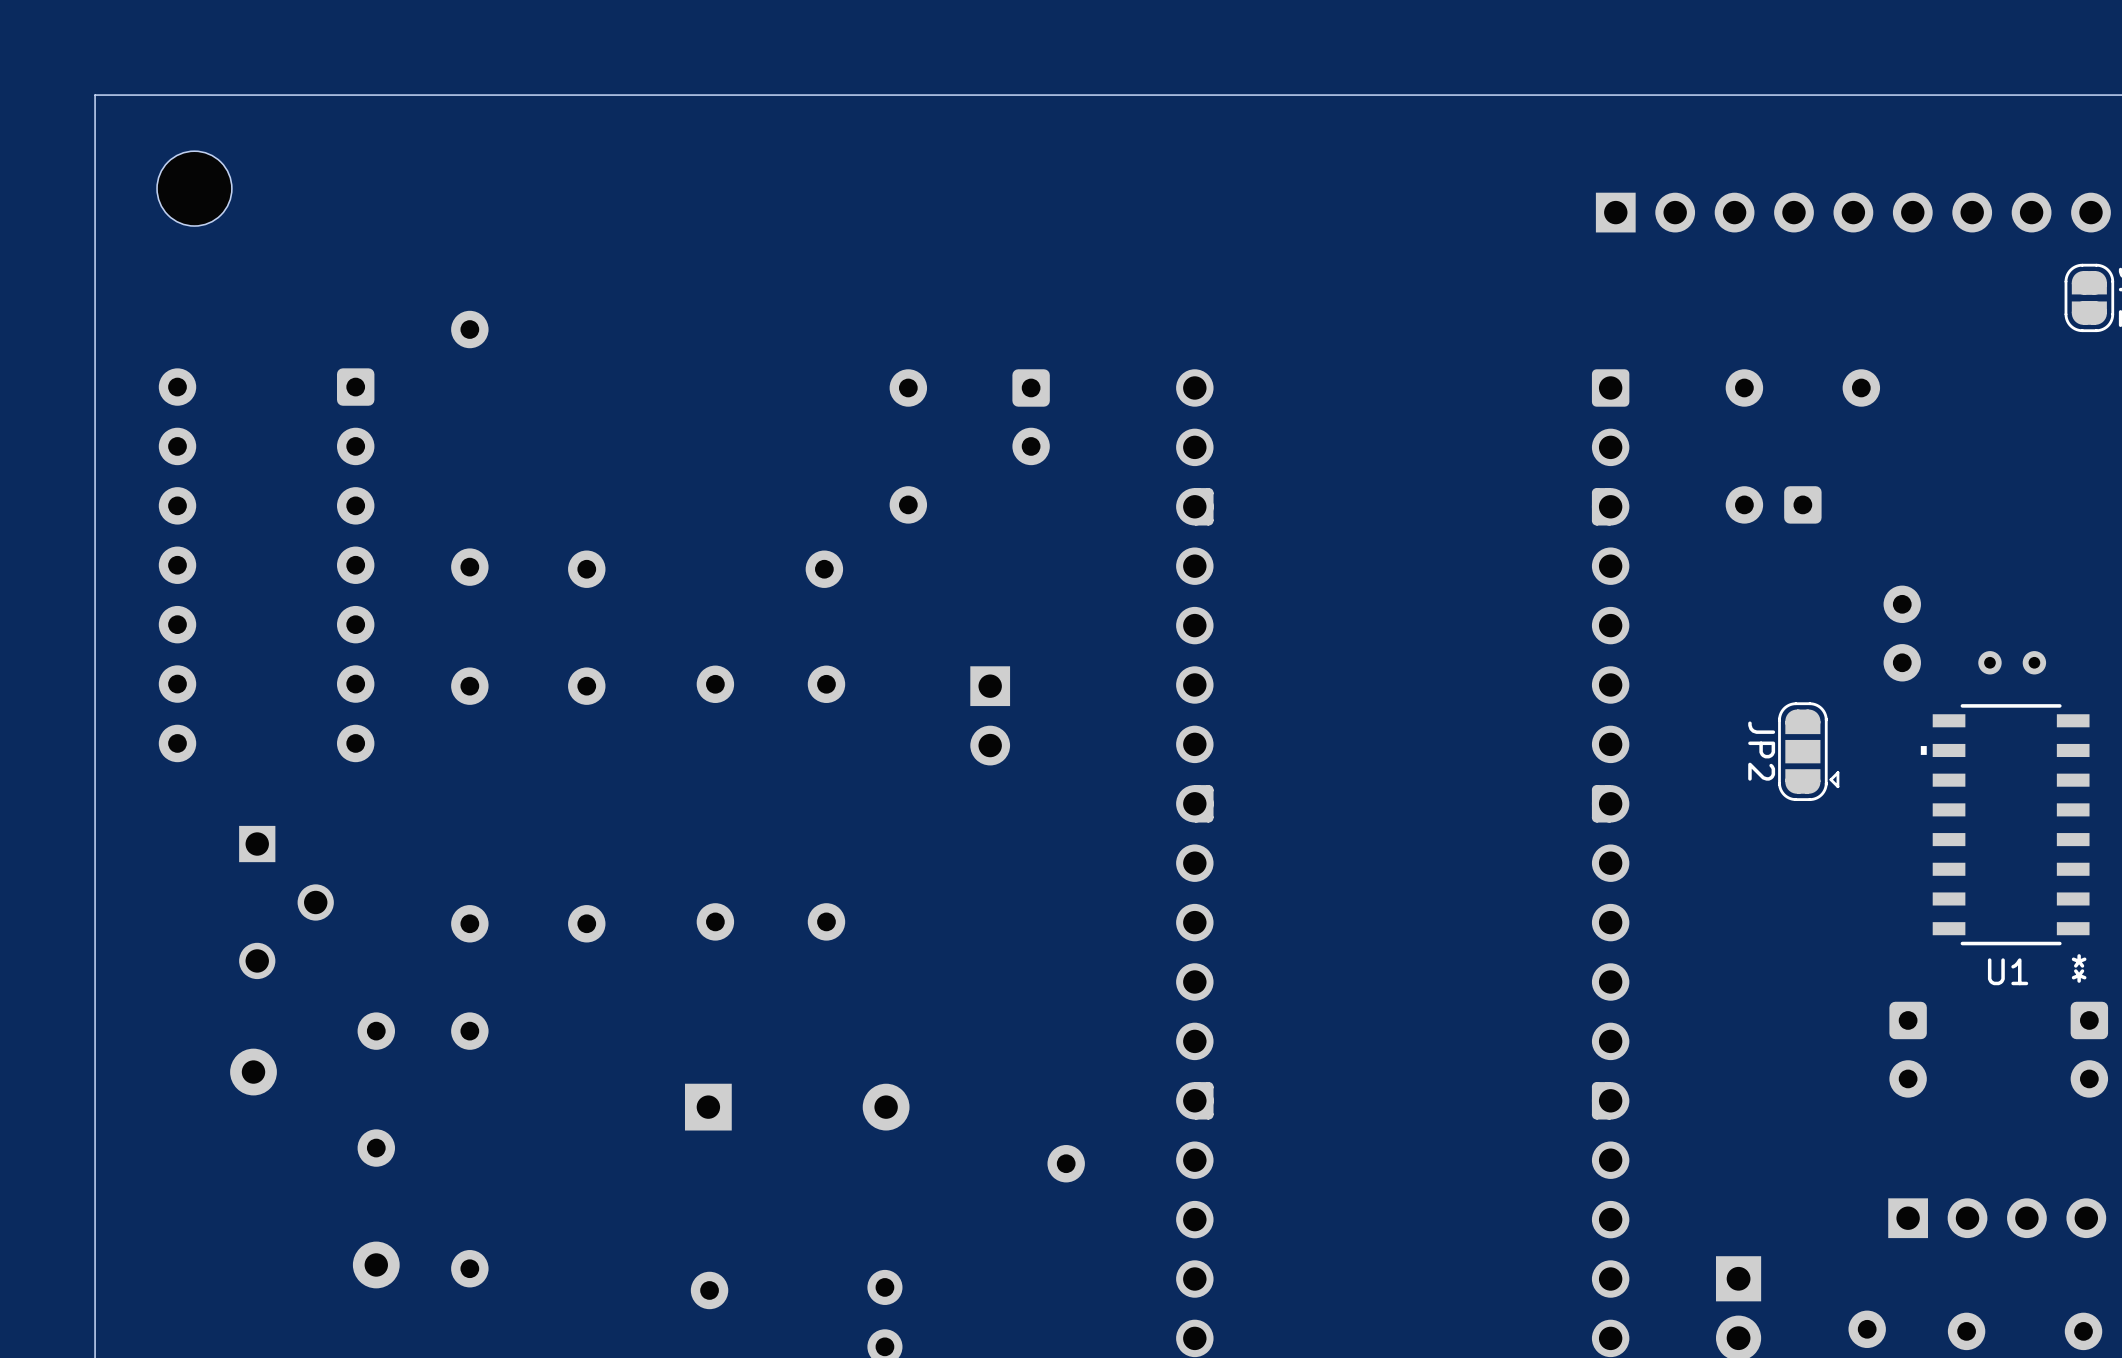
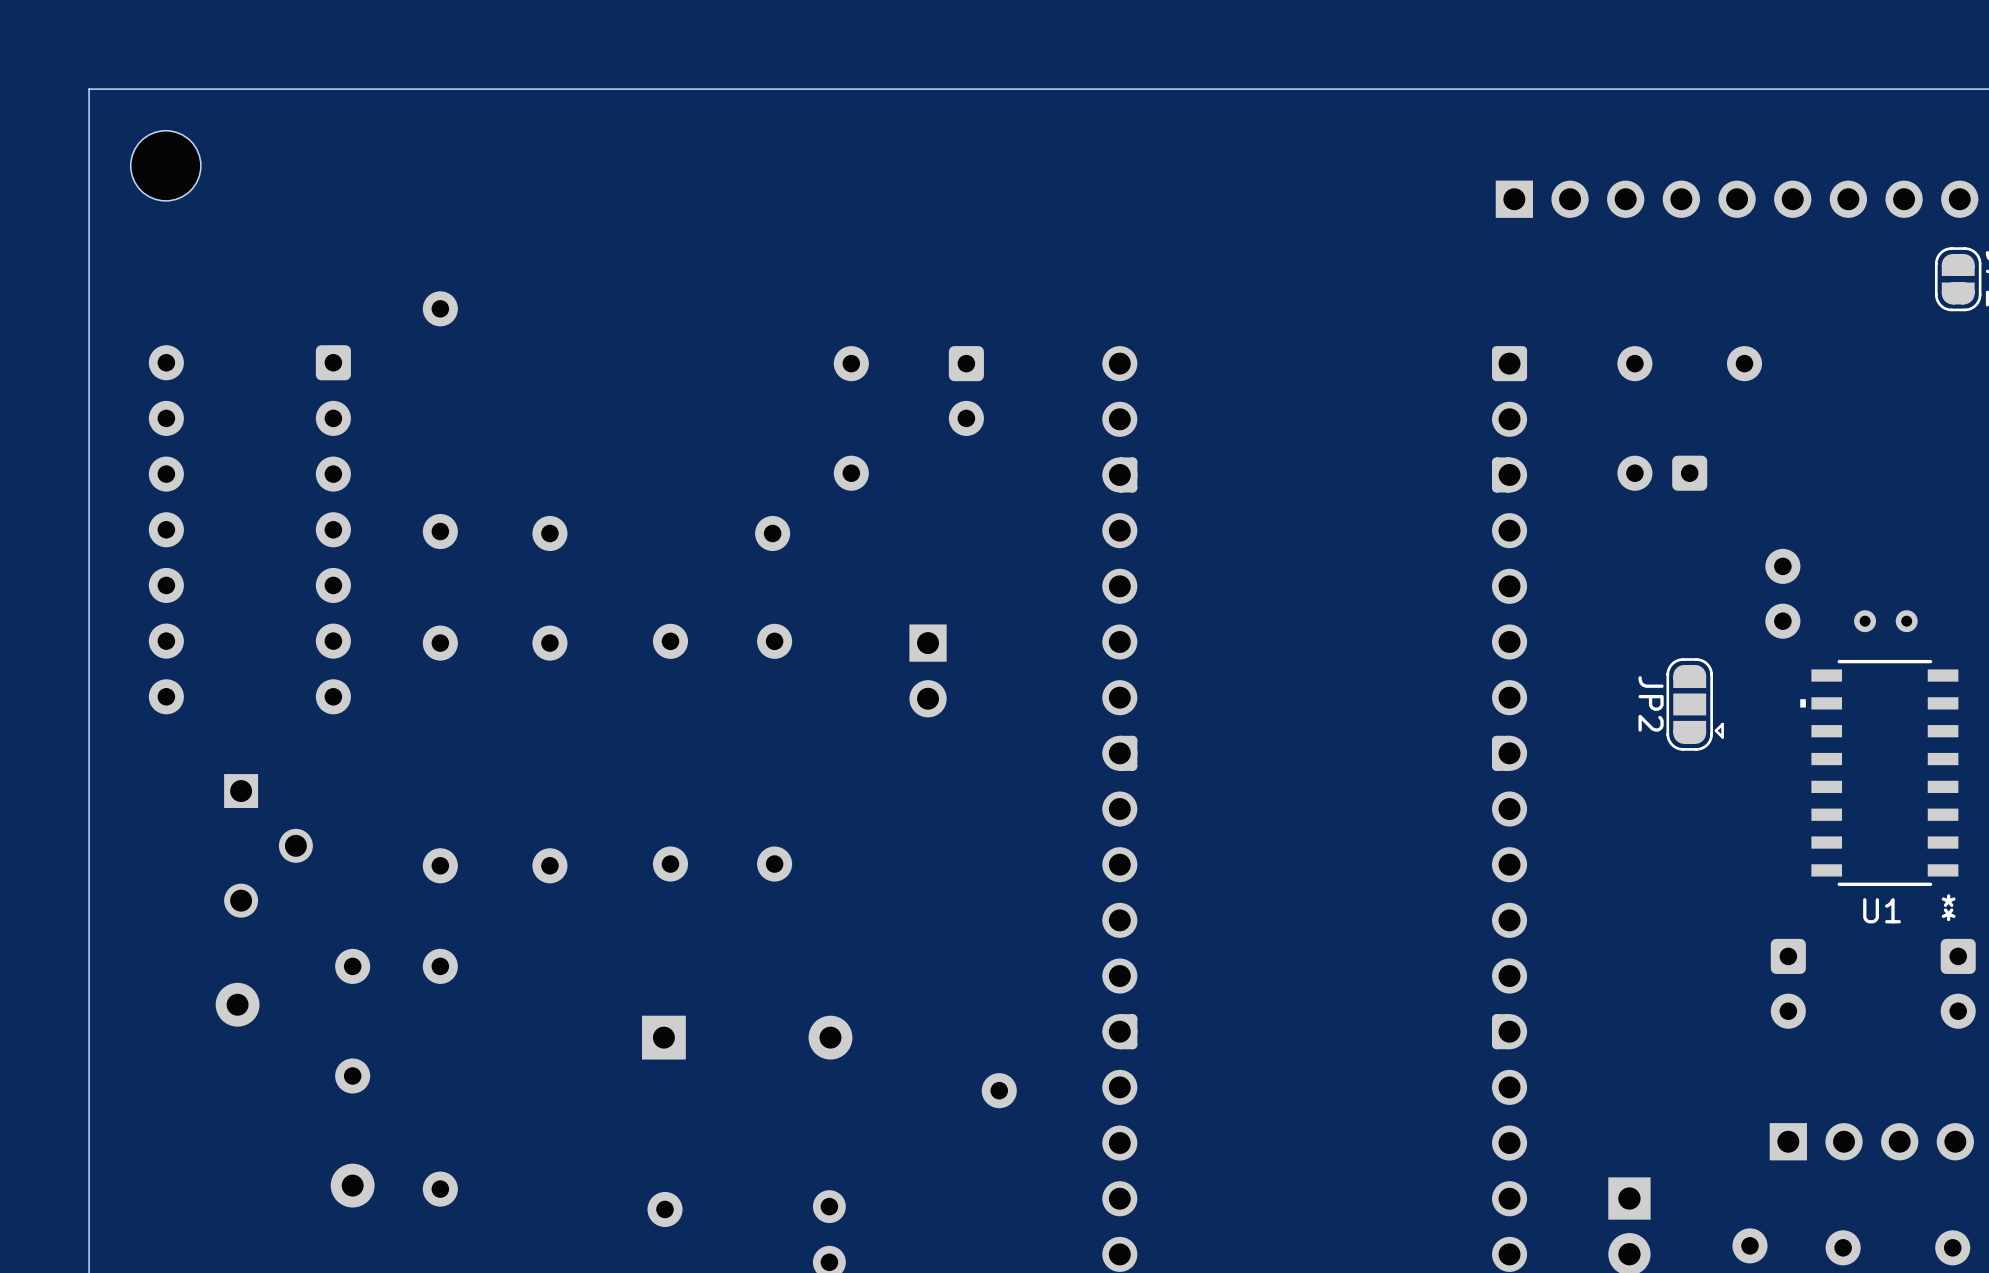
part position: (194, 188) -> (165, 165)

